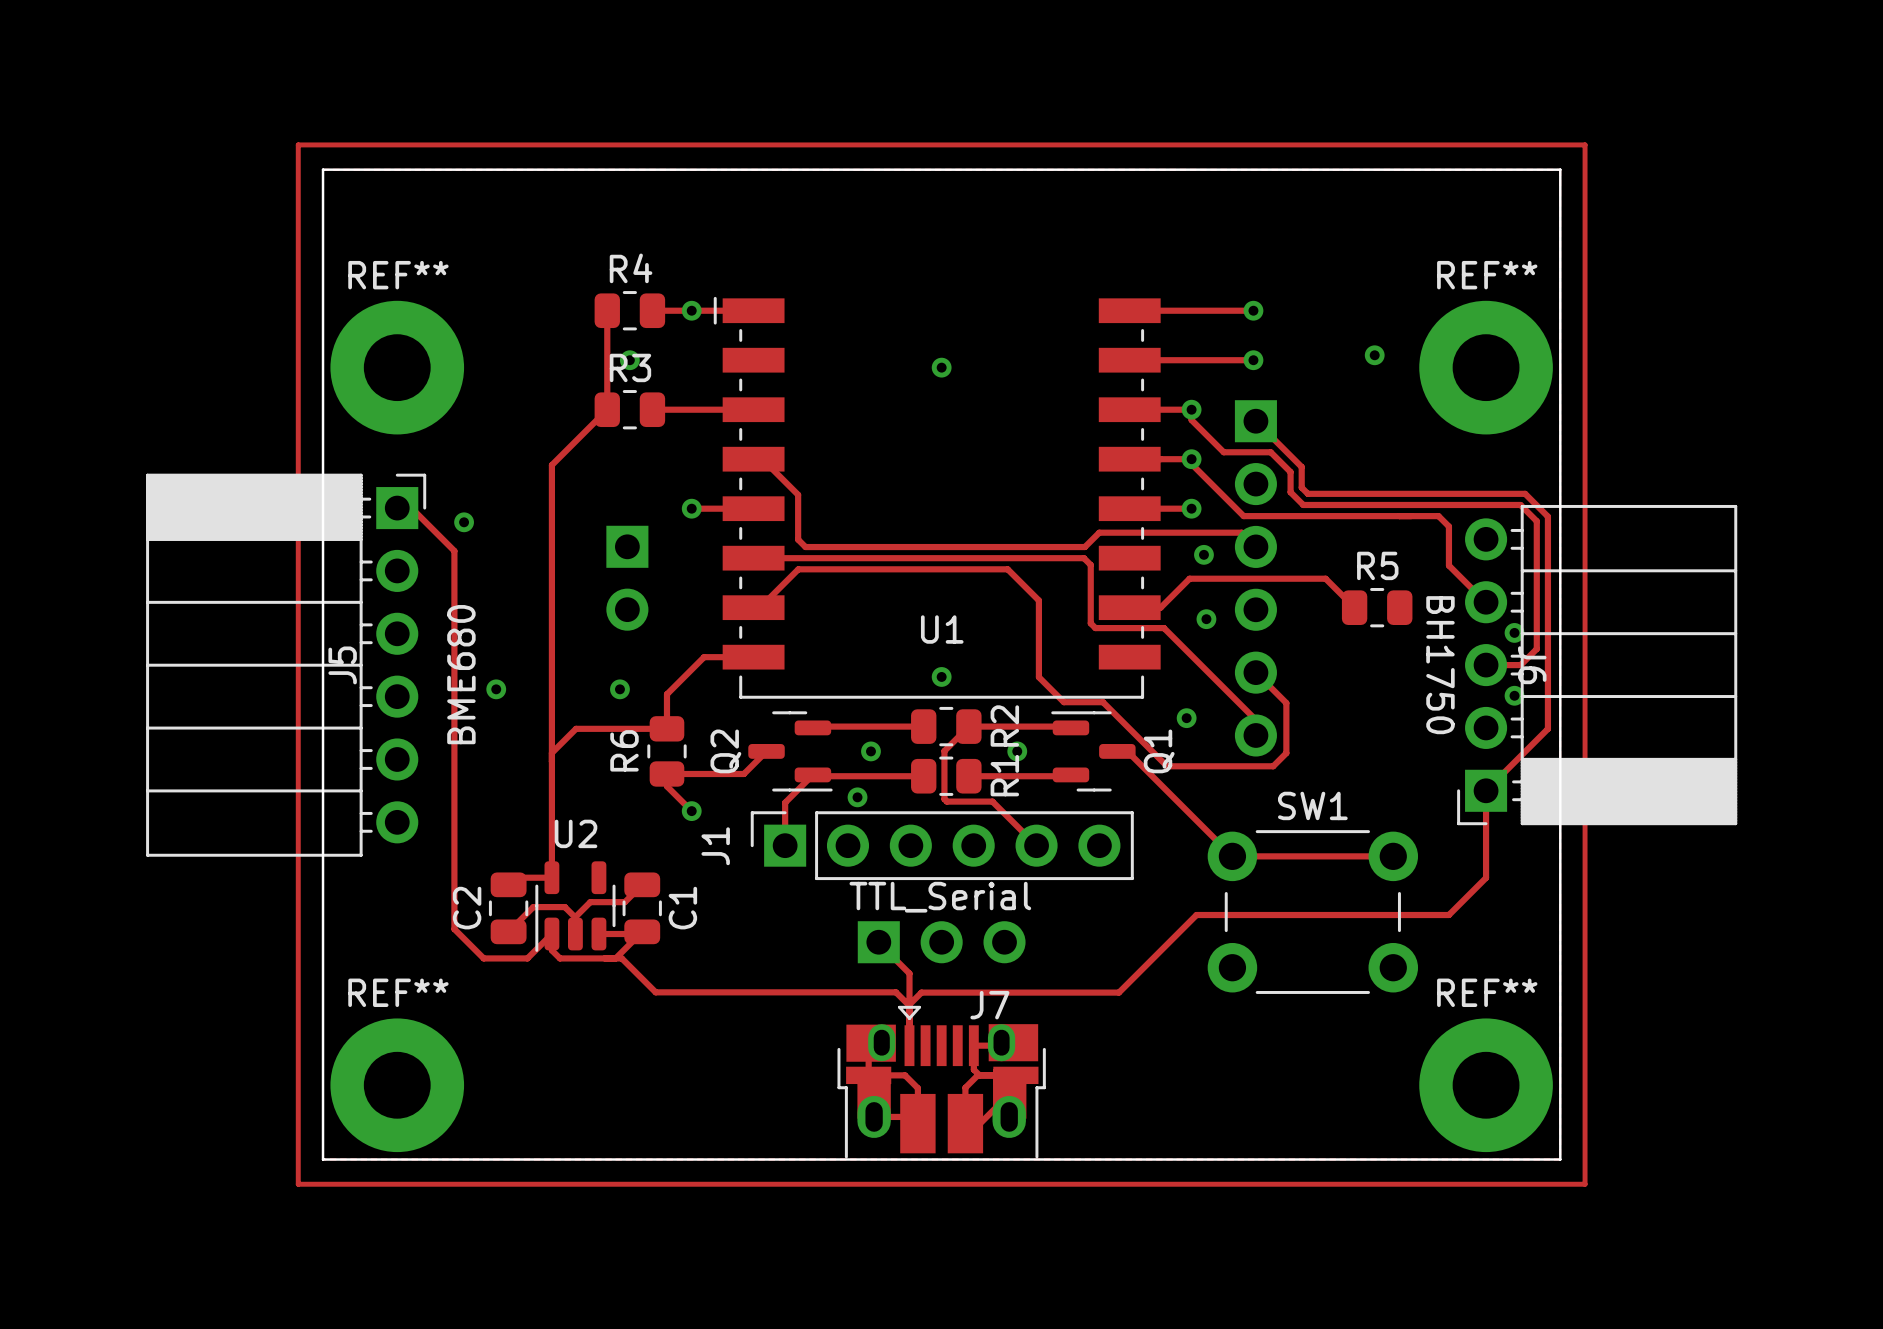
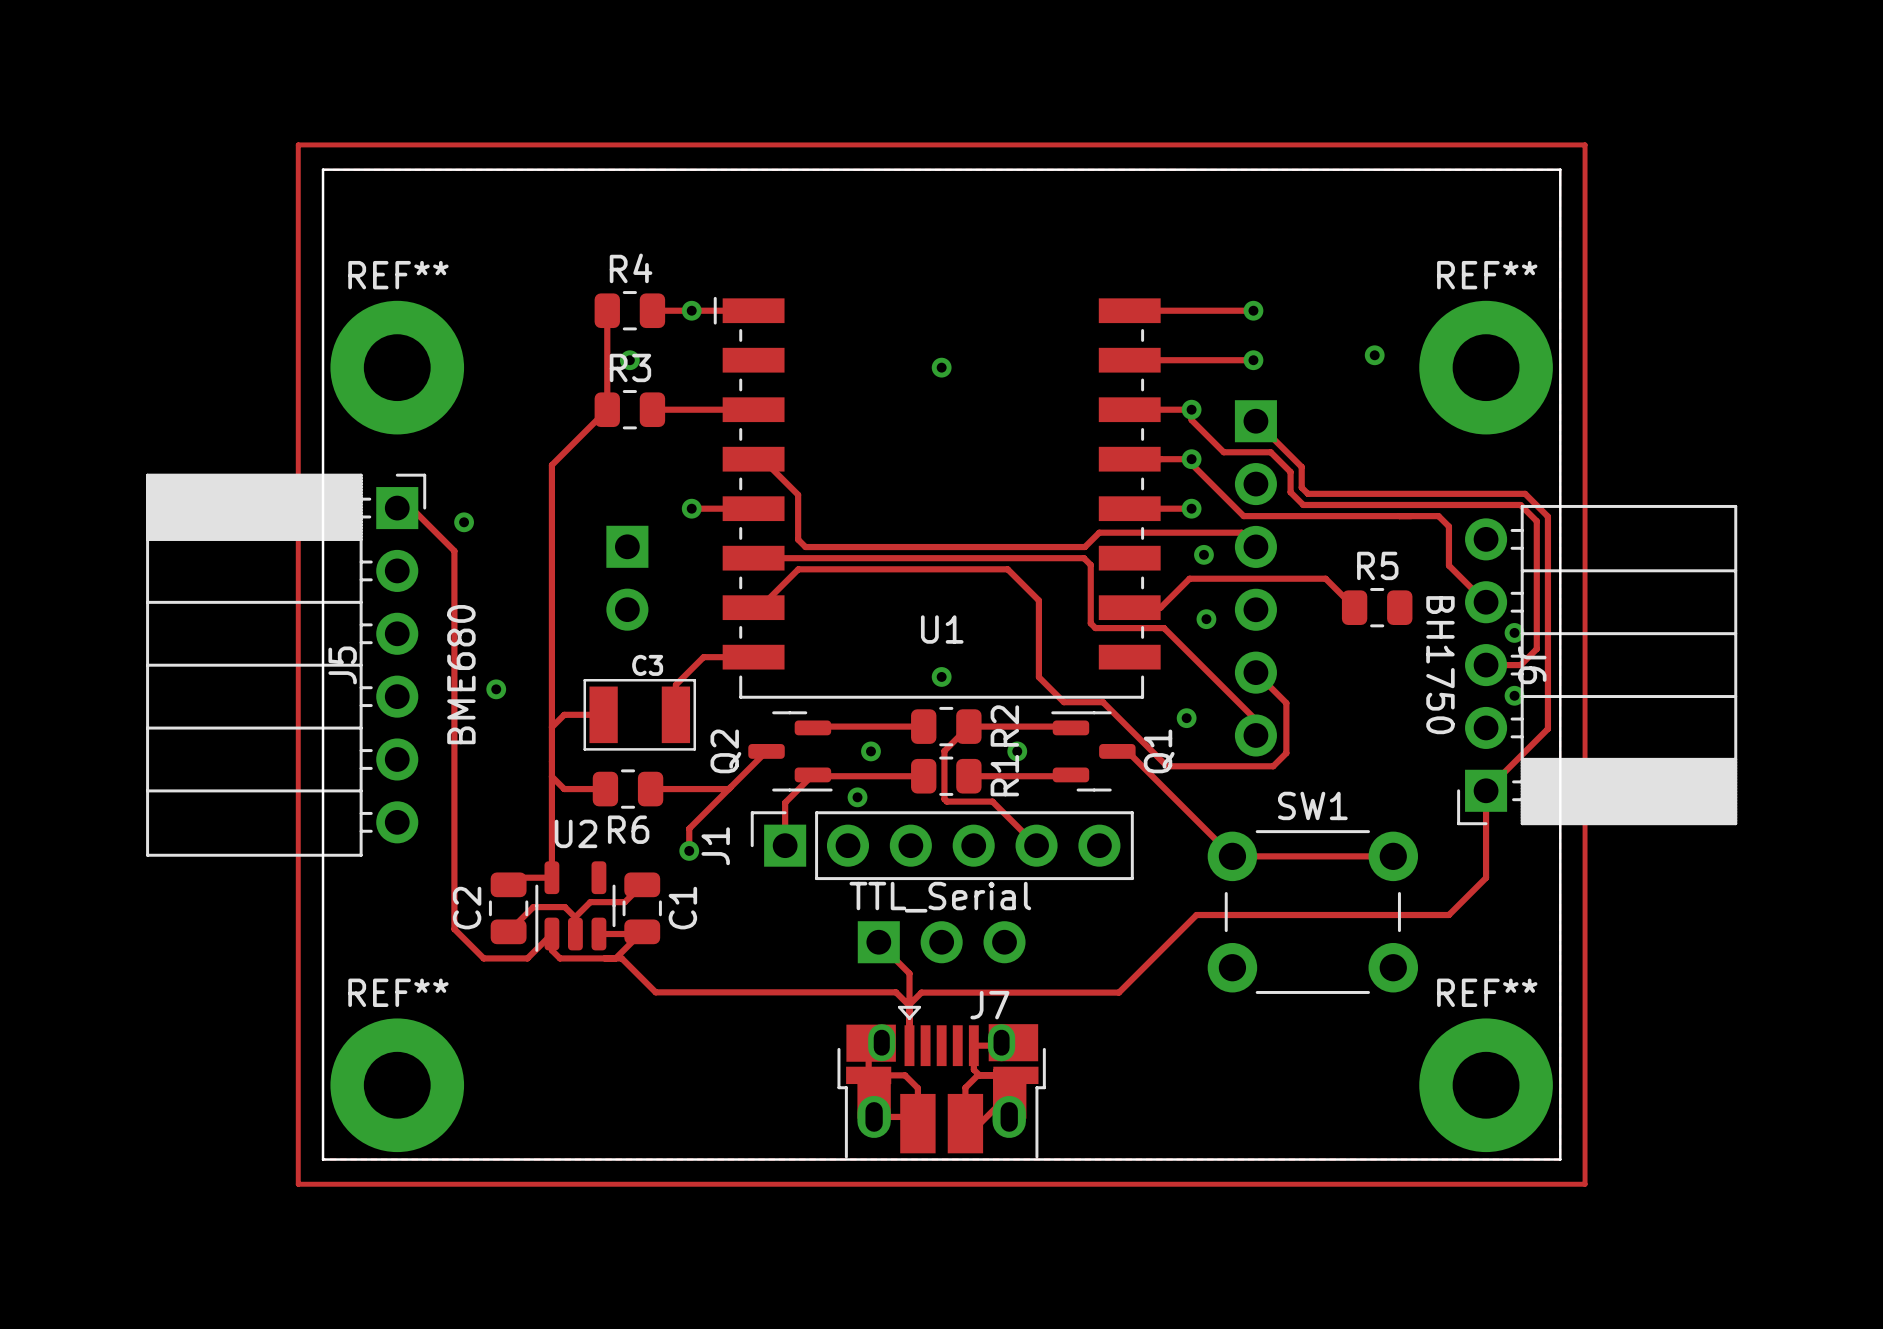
track: (704, 657) (666, 694) (666, 728) (576, 728) (551, 752) -> (703, 657) (675, 684) (675, 714)
via: (619, 689) -> none
track: none -> (603, 714) (564, 714) (551, 727)
C3: none -> (639, 714)
R6 name position: R6 (624, 750) -> R6 (628, 829)
R6 rotation: 0° (666, 751) -> 90° clockwise (628, 789)
R6 position: (666, 751) -> (628, 789)
track: (743, 773) (666, 773) (666, 786) (691, 811) -> (743, 773) (689, 828) (689, 850)
track: none -> (551, 776) (564, 789) (605, 789)
track: none -> (650, 789) (728, 789)
via position: (691, 811) -> (689, 850)

